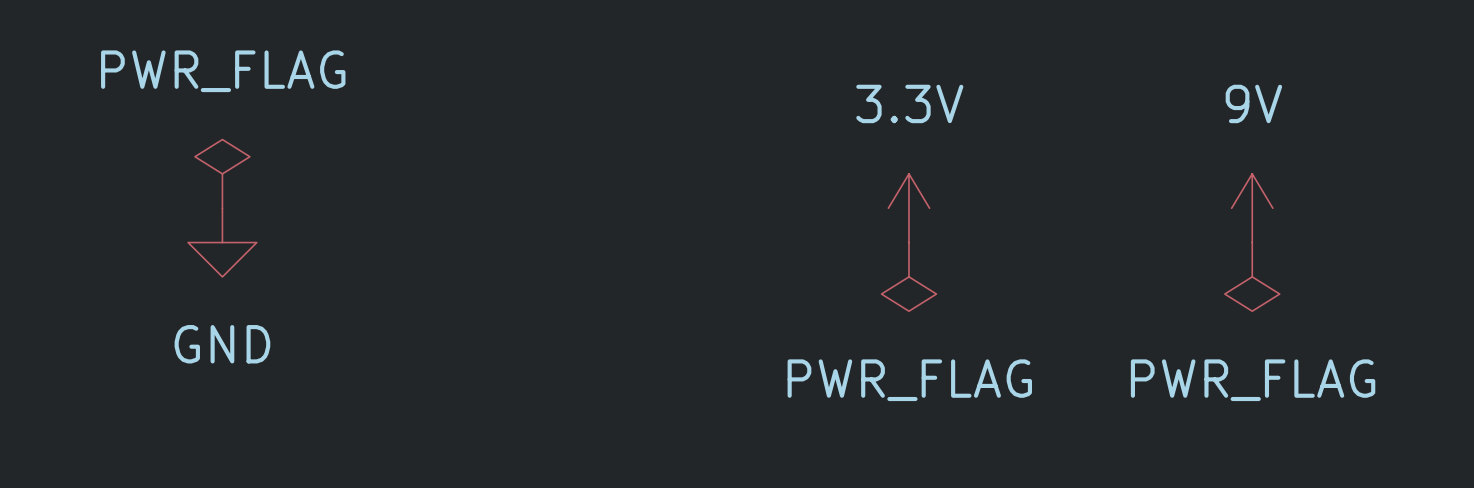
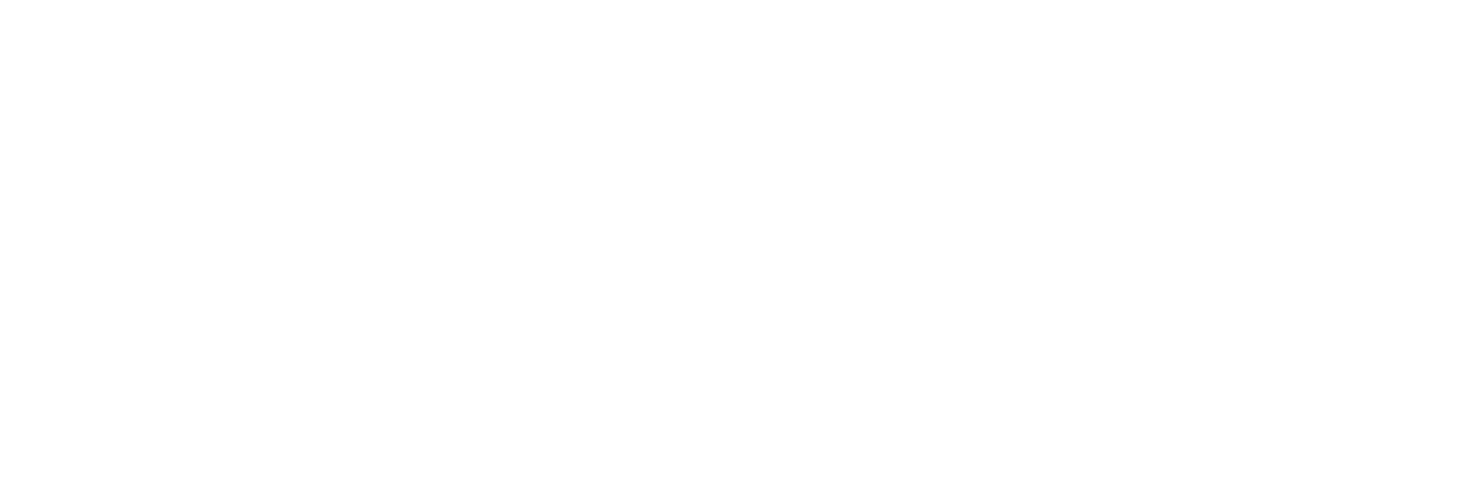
power symbol: PWR_FLAG (222, 173) -> none
power symbol: 3.3V (908, 208) -> none
power symbol: 9V (1252, 208) -> none
power symbol: GND (222, 242) -> none
power symbol: PWR_FLAG (908, 276) -> none
power symbol: PWR_FLAG (1252, 276) -> none

